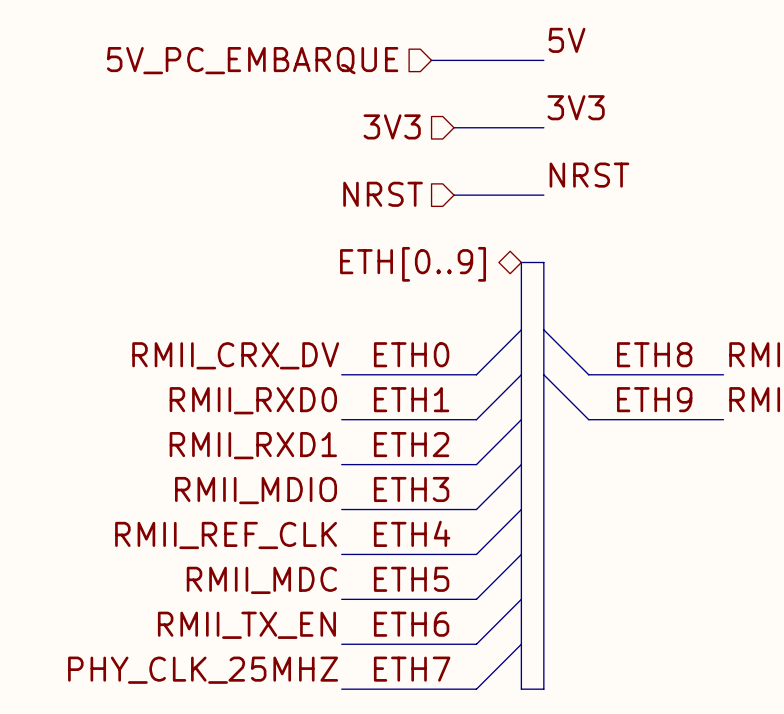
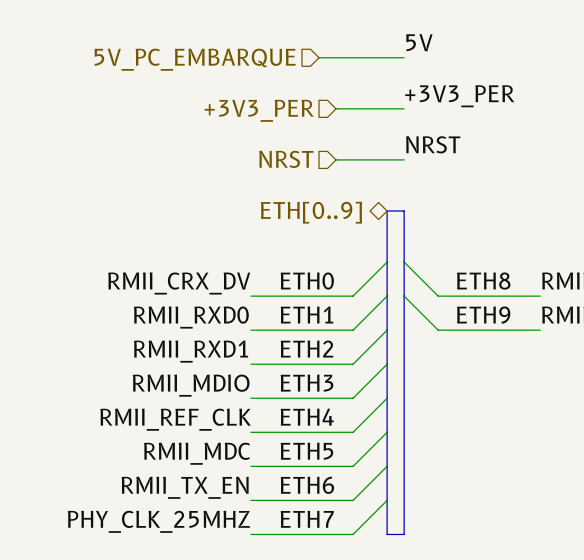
label: 3V3 (576, 107) -> +3V3_PER (459, 96)
hierarchical label: 3V3 (392, 126) -> +3V3_PER (259, 110)

